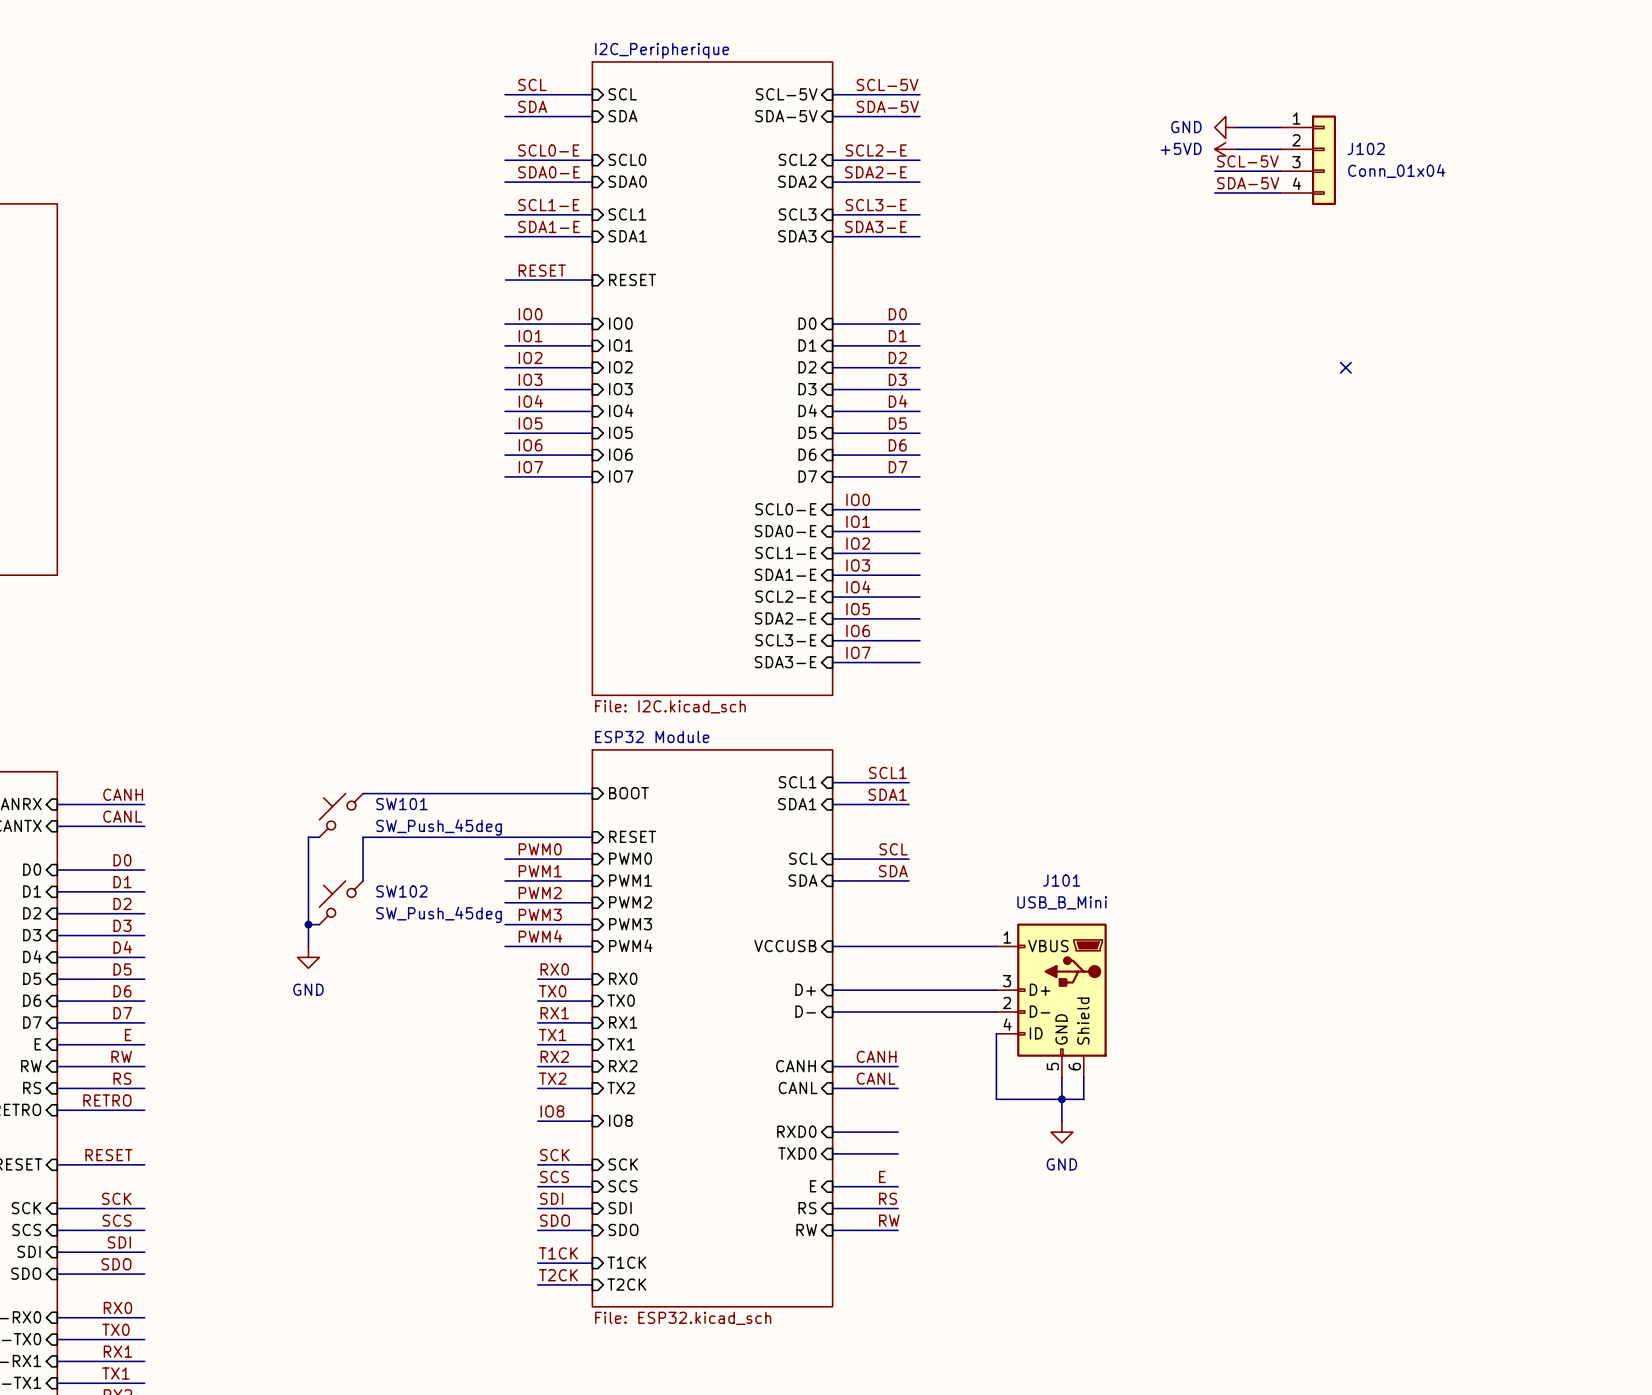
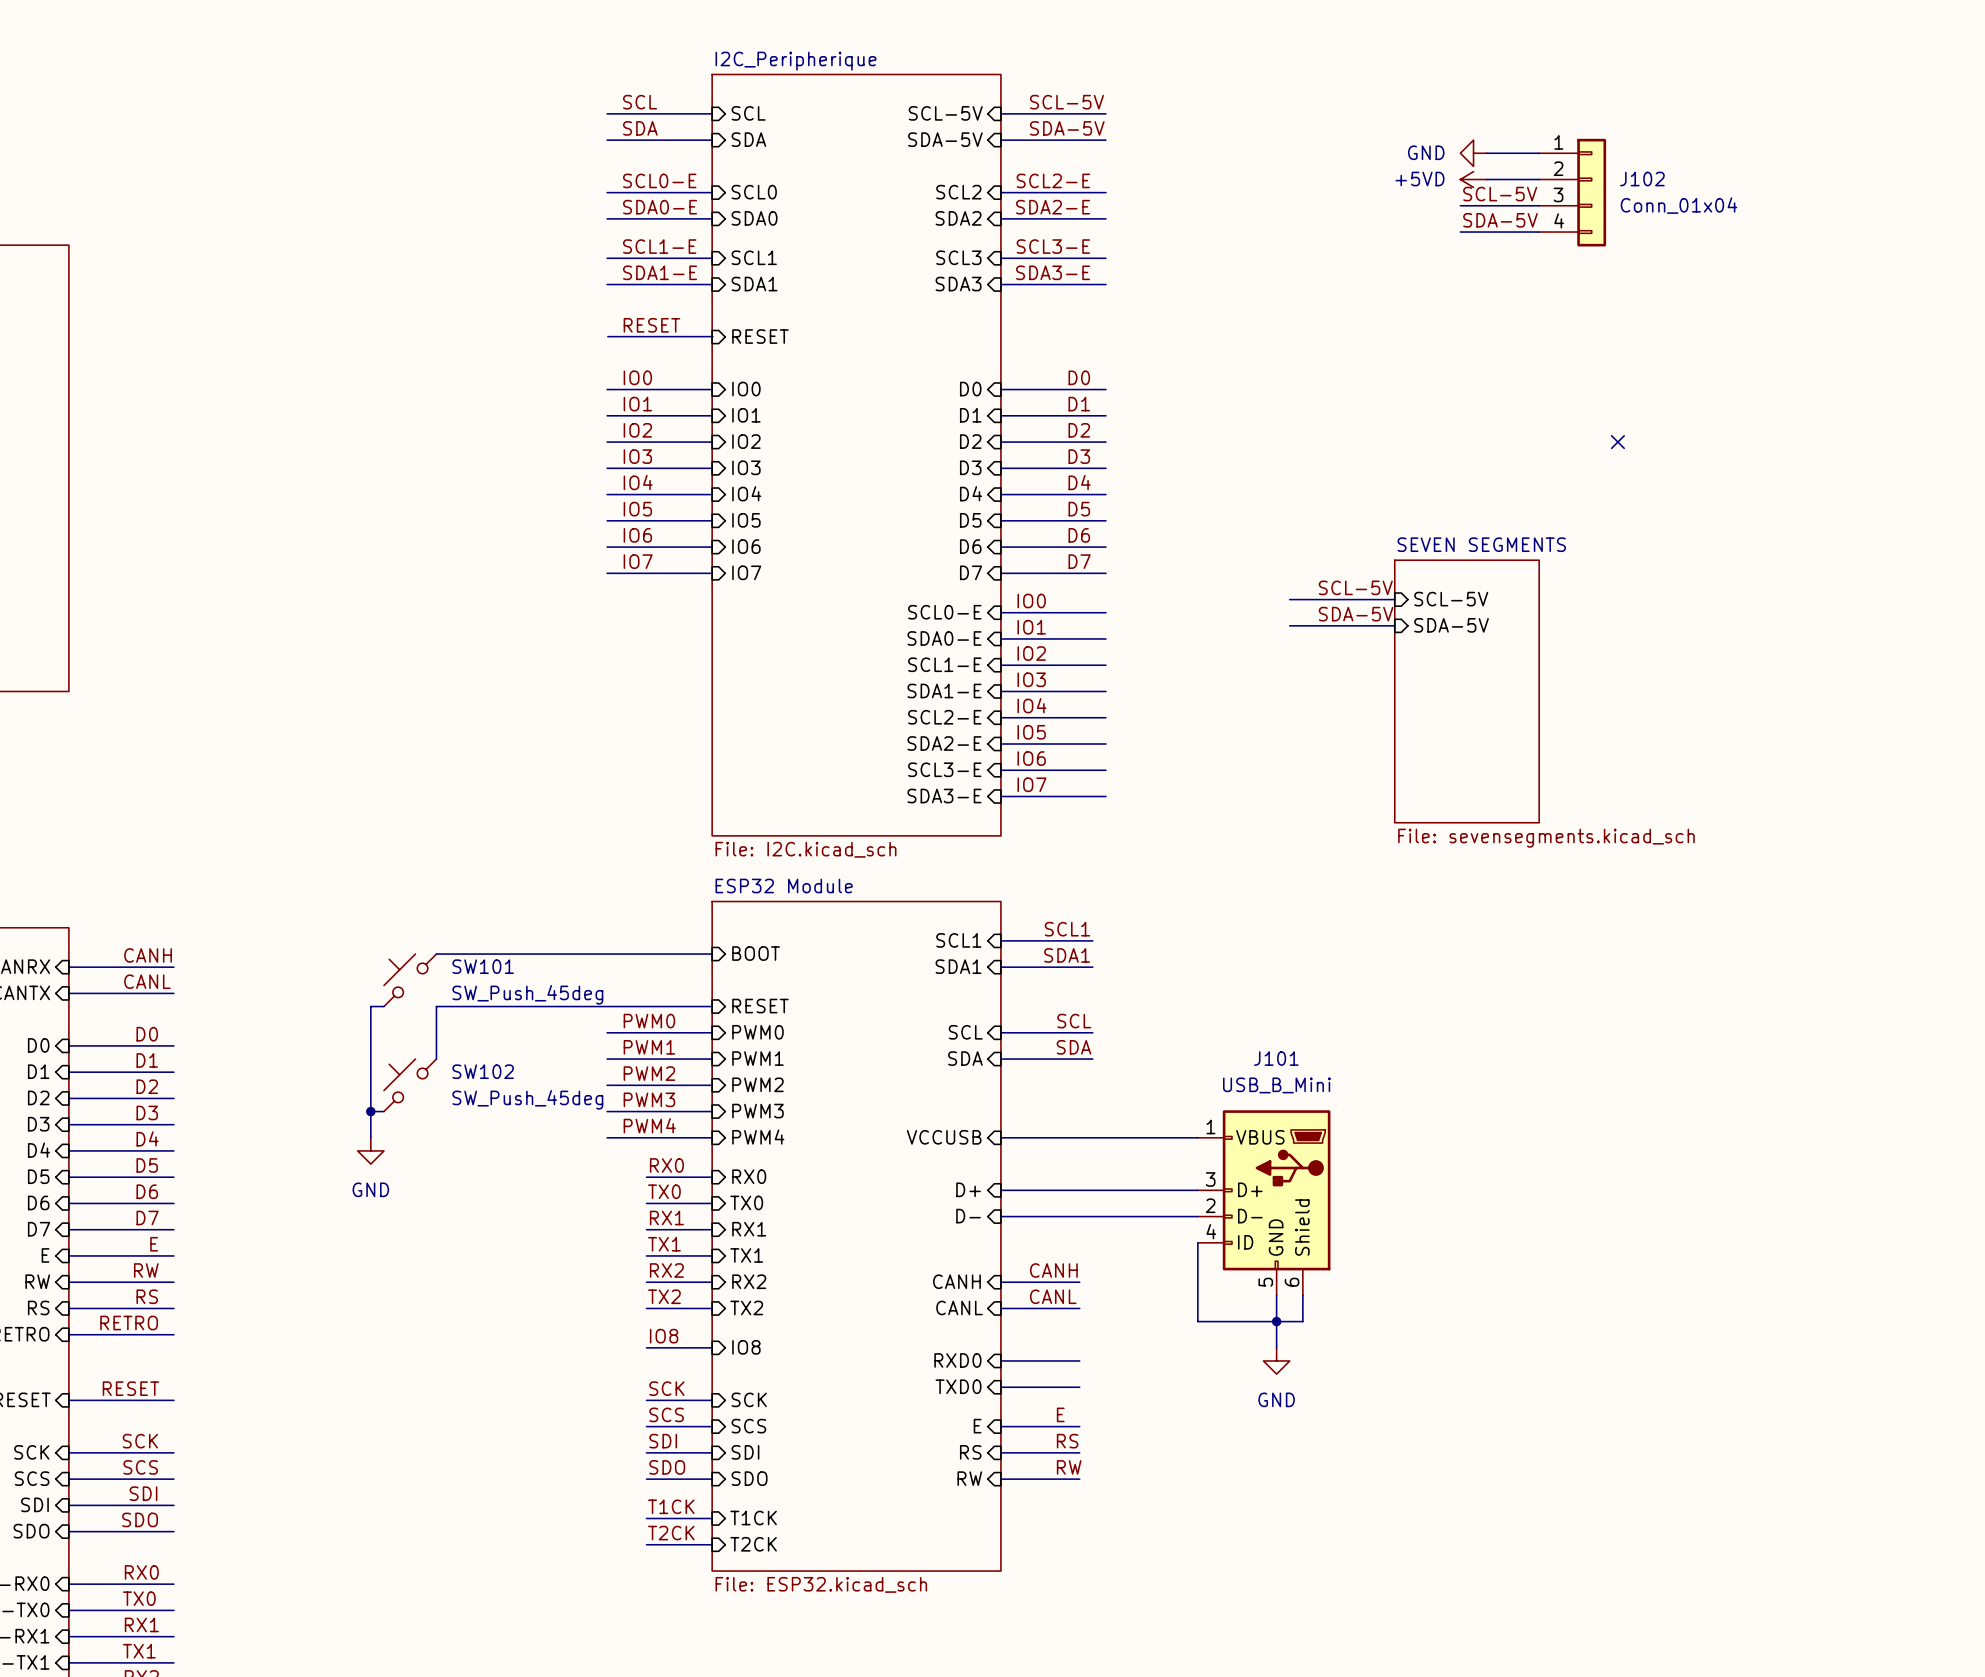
label: none -> SCL-5V (1355, 587)
wire: none -> (1289, 599) (1394, 599)
sheet pin: none -> SCL-5V (1451, 599)
label: none -> SDA-5V (1356, 614)
wire: none -> (1289, 625) (1394, 625)
sheet pin: none -> SDA-5V (1451, 625)
sheet SEVEN SEGMENTS: none -> File: sevensegments.kicad_sch (1466, 691)

